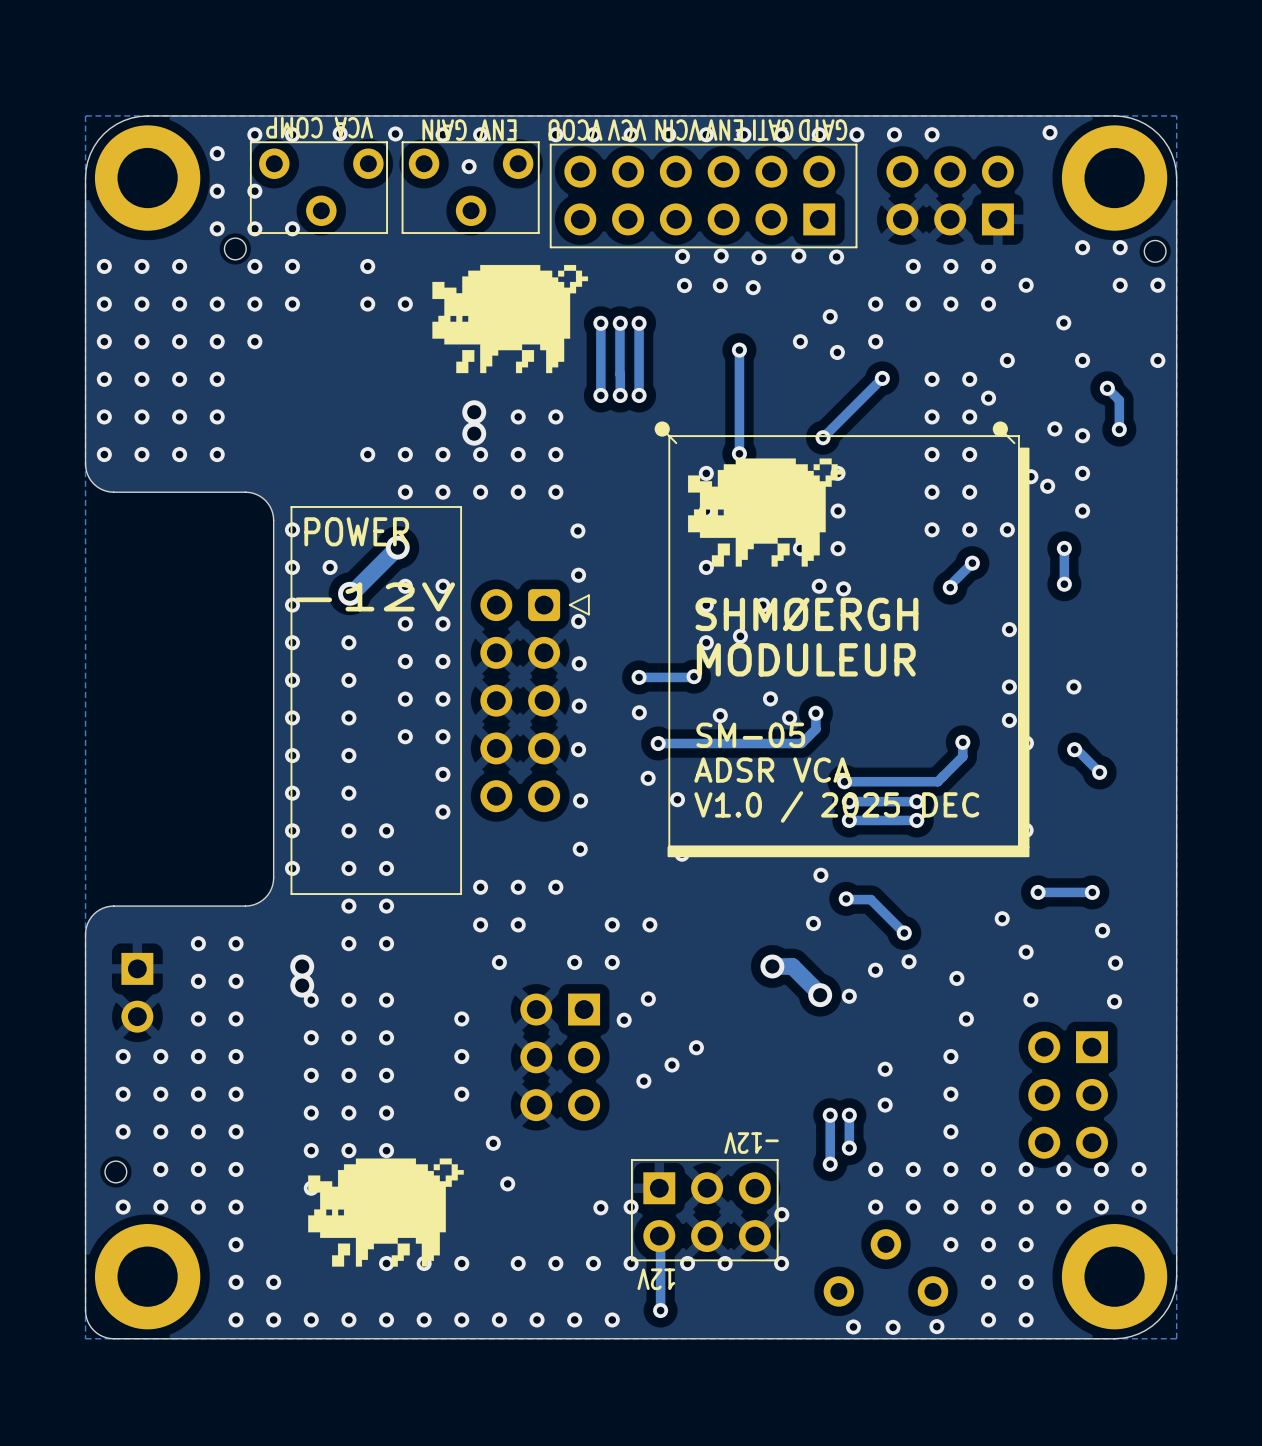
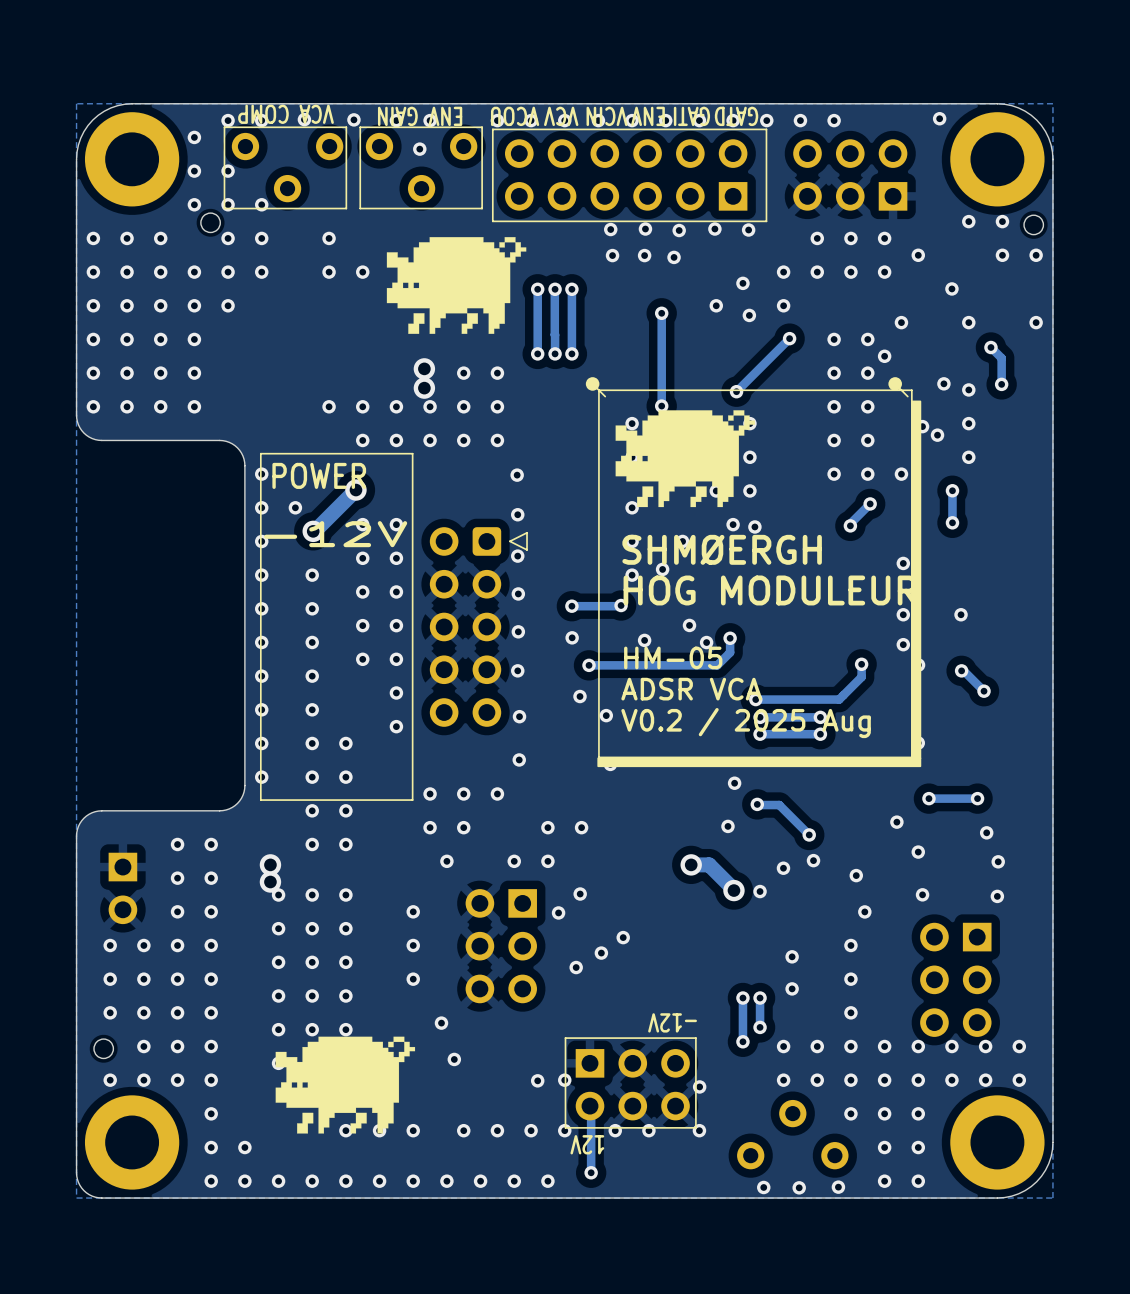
text: MODULEUR (806, 659) -> HOG MODULEUR (770, 590)
text: SM-05 (750, 735) -> HM-05 (673, 657)
text: V1.0 / 2025 DEC (836, 806) -> V0.2 / 2025 Aug (746, 723)

